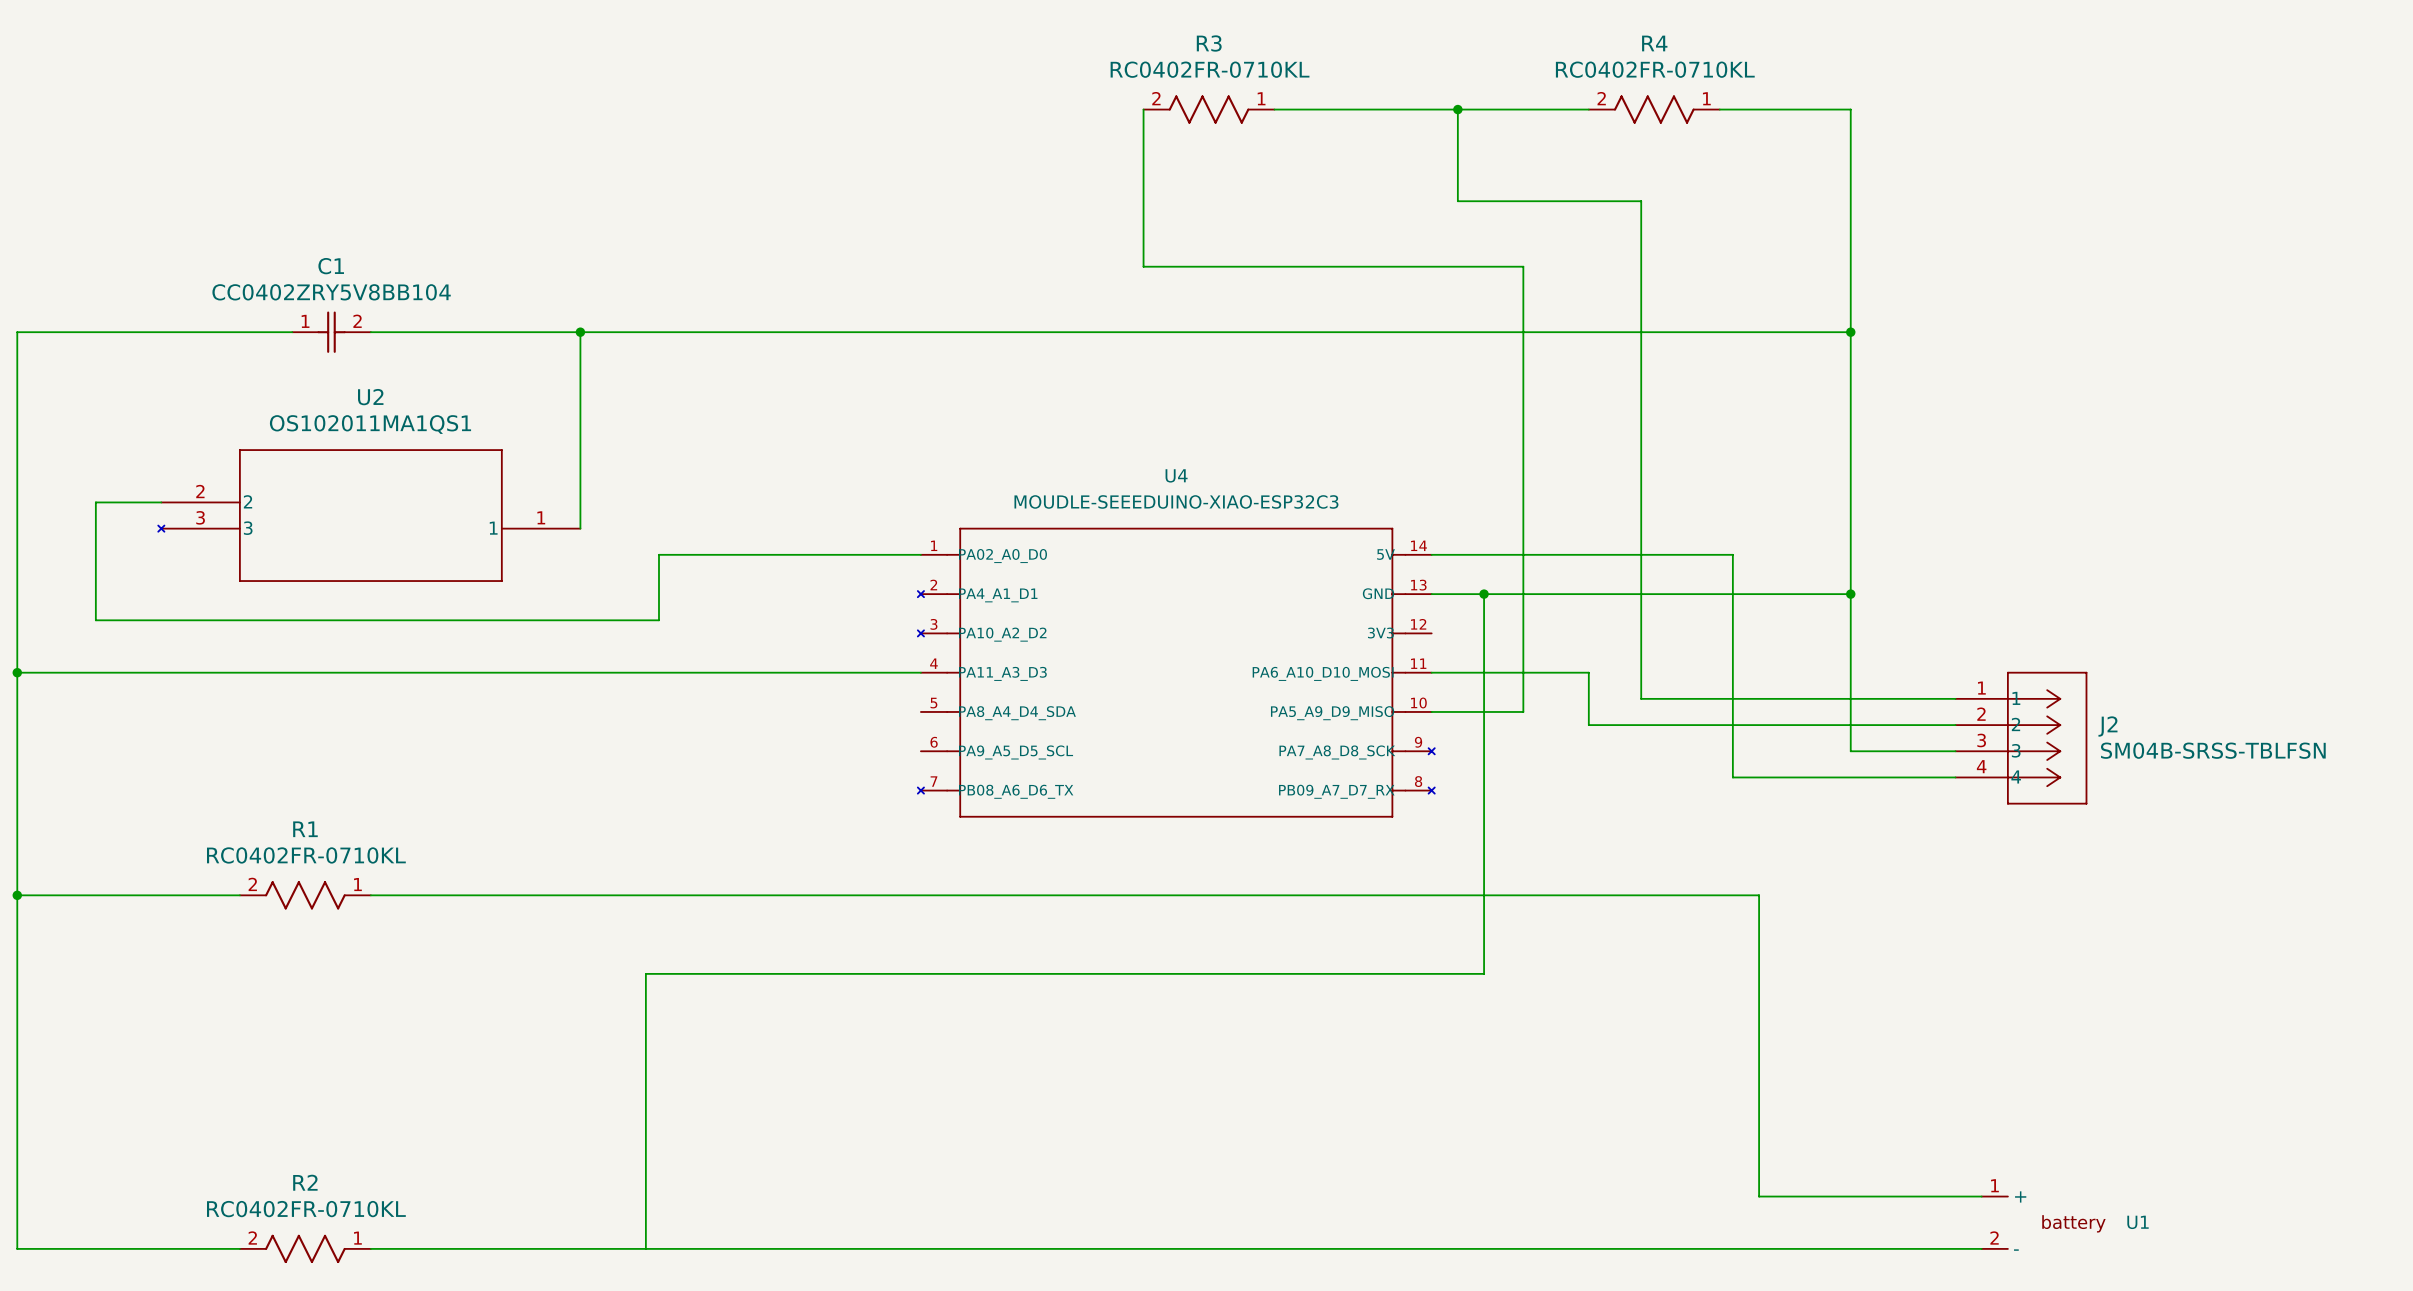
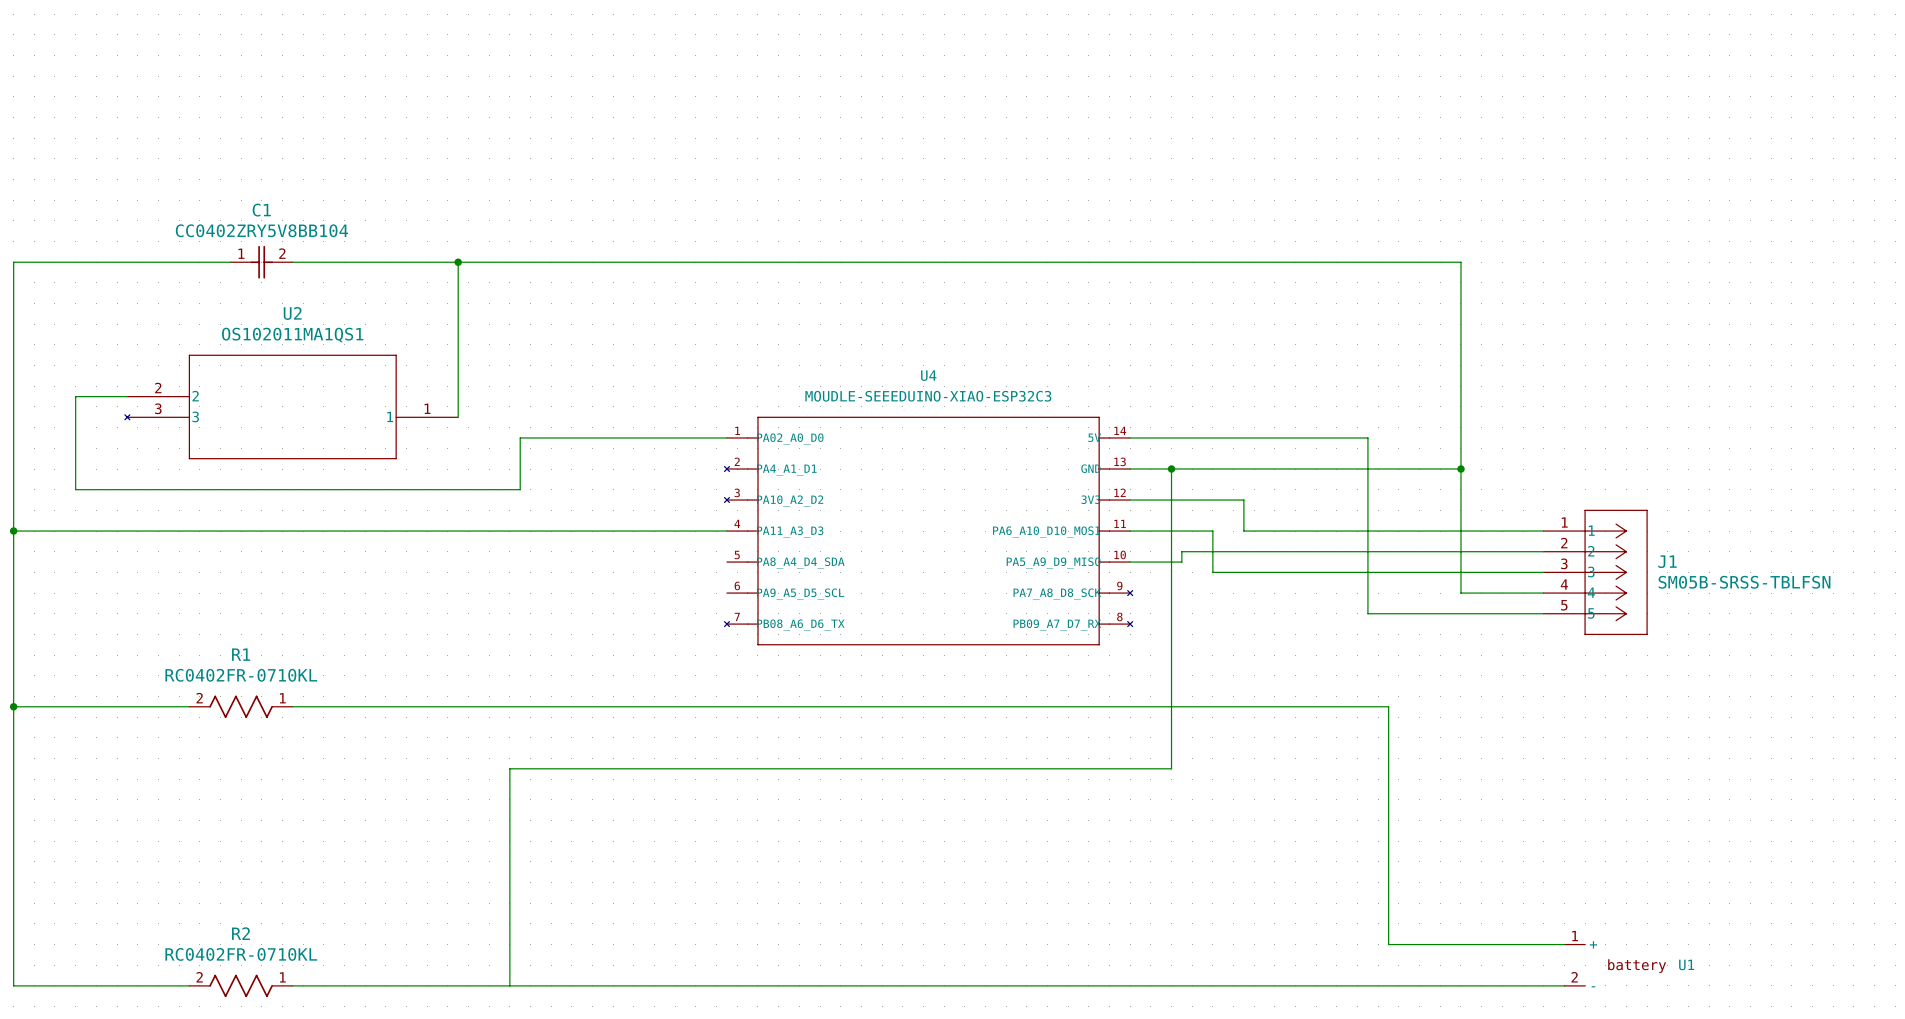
wire: (1143, 109) (1143, 266) (1523, 266) (1523, 711) (1497, 711) -> none
R3: RC0402FR-0710KL (1209, 109) -> none
wire: (1274, 109) (1588, 109) -> none
wire: (1457, 109) (1457, 201) (1641, 201) (1641, 698) -> (1181, 562) (1181, 551) (1295, 551)
junction: (1457, 109) -> none
R4: RC0402FR-0710KL (1654, 109) -> none
wire: (1719, 109) (1850, 109) (1850, 332) -> none
junction: (1850, 332) -> none
wire: (1536, 672) (1575, 672) -> (1130, 500) (1243, 500) (1243, 531)
wire: (1588, 672) (1588, 725) -> (1212, 531) (1212, 572) (1254, 572)
wire: none -> (1254, 531) (1543, 531)
J1: none -> SM05B-SRSS-TBLFSN (1595, 572)
J2: SM04B-SRSS-TBLFSN (2021, 738) -> none

